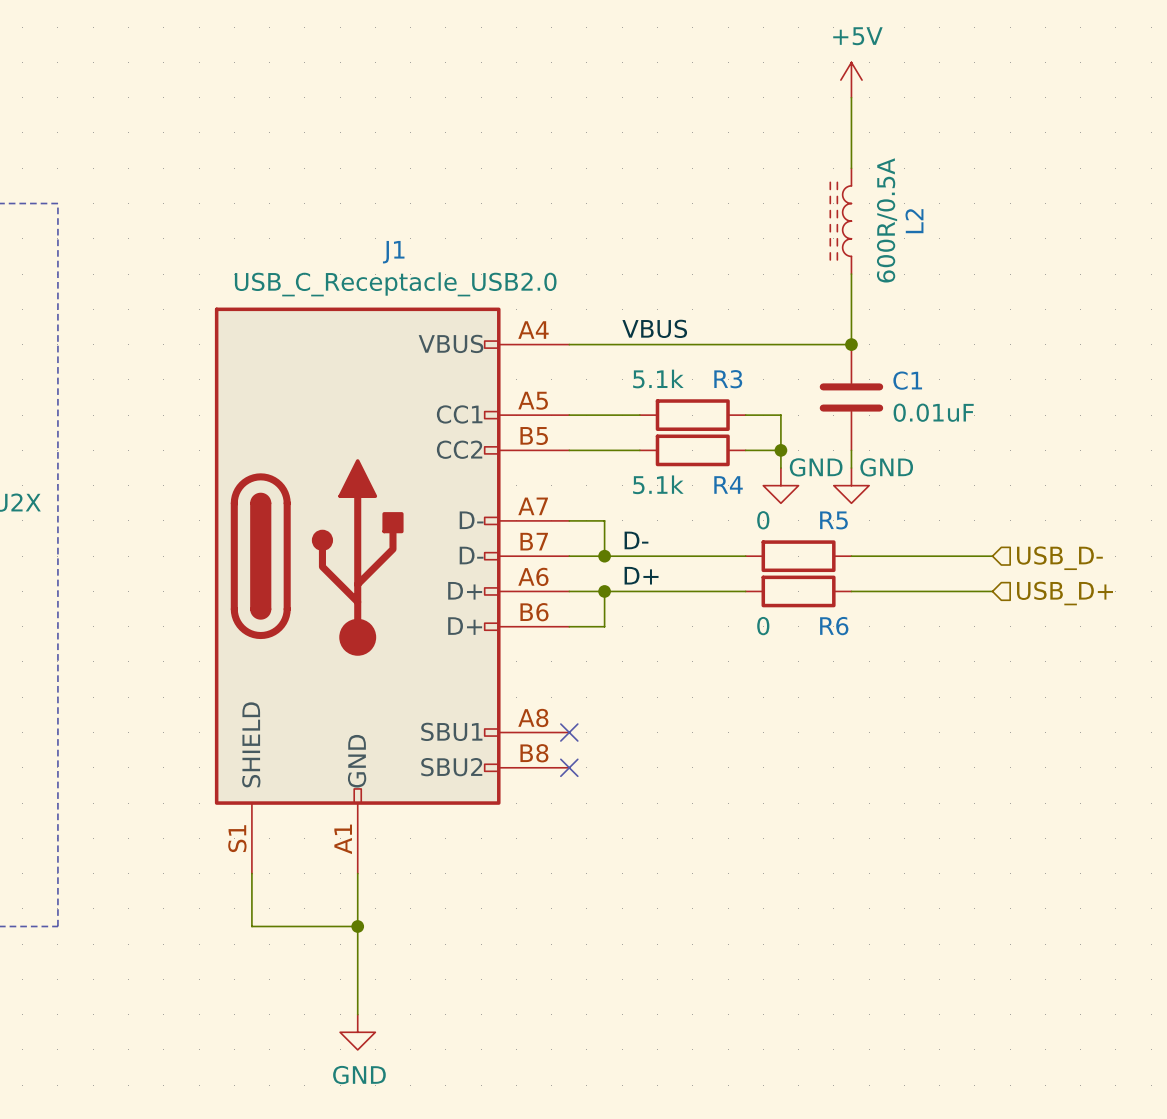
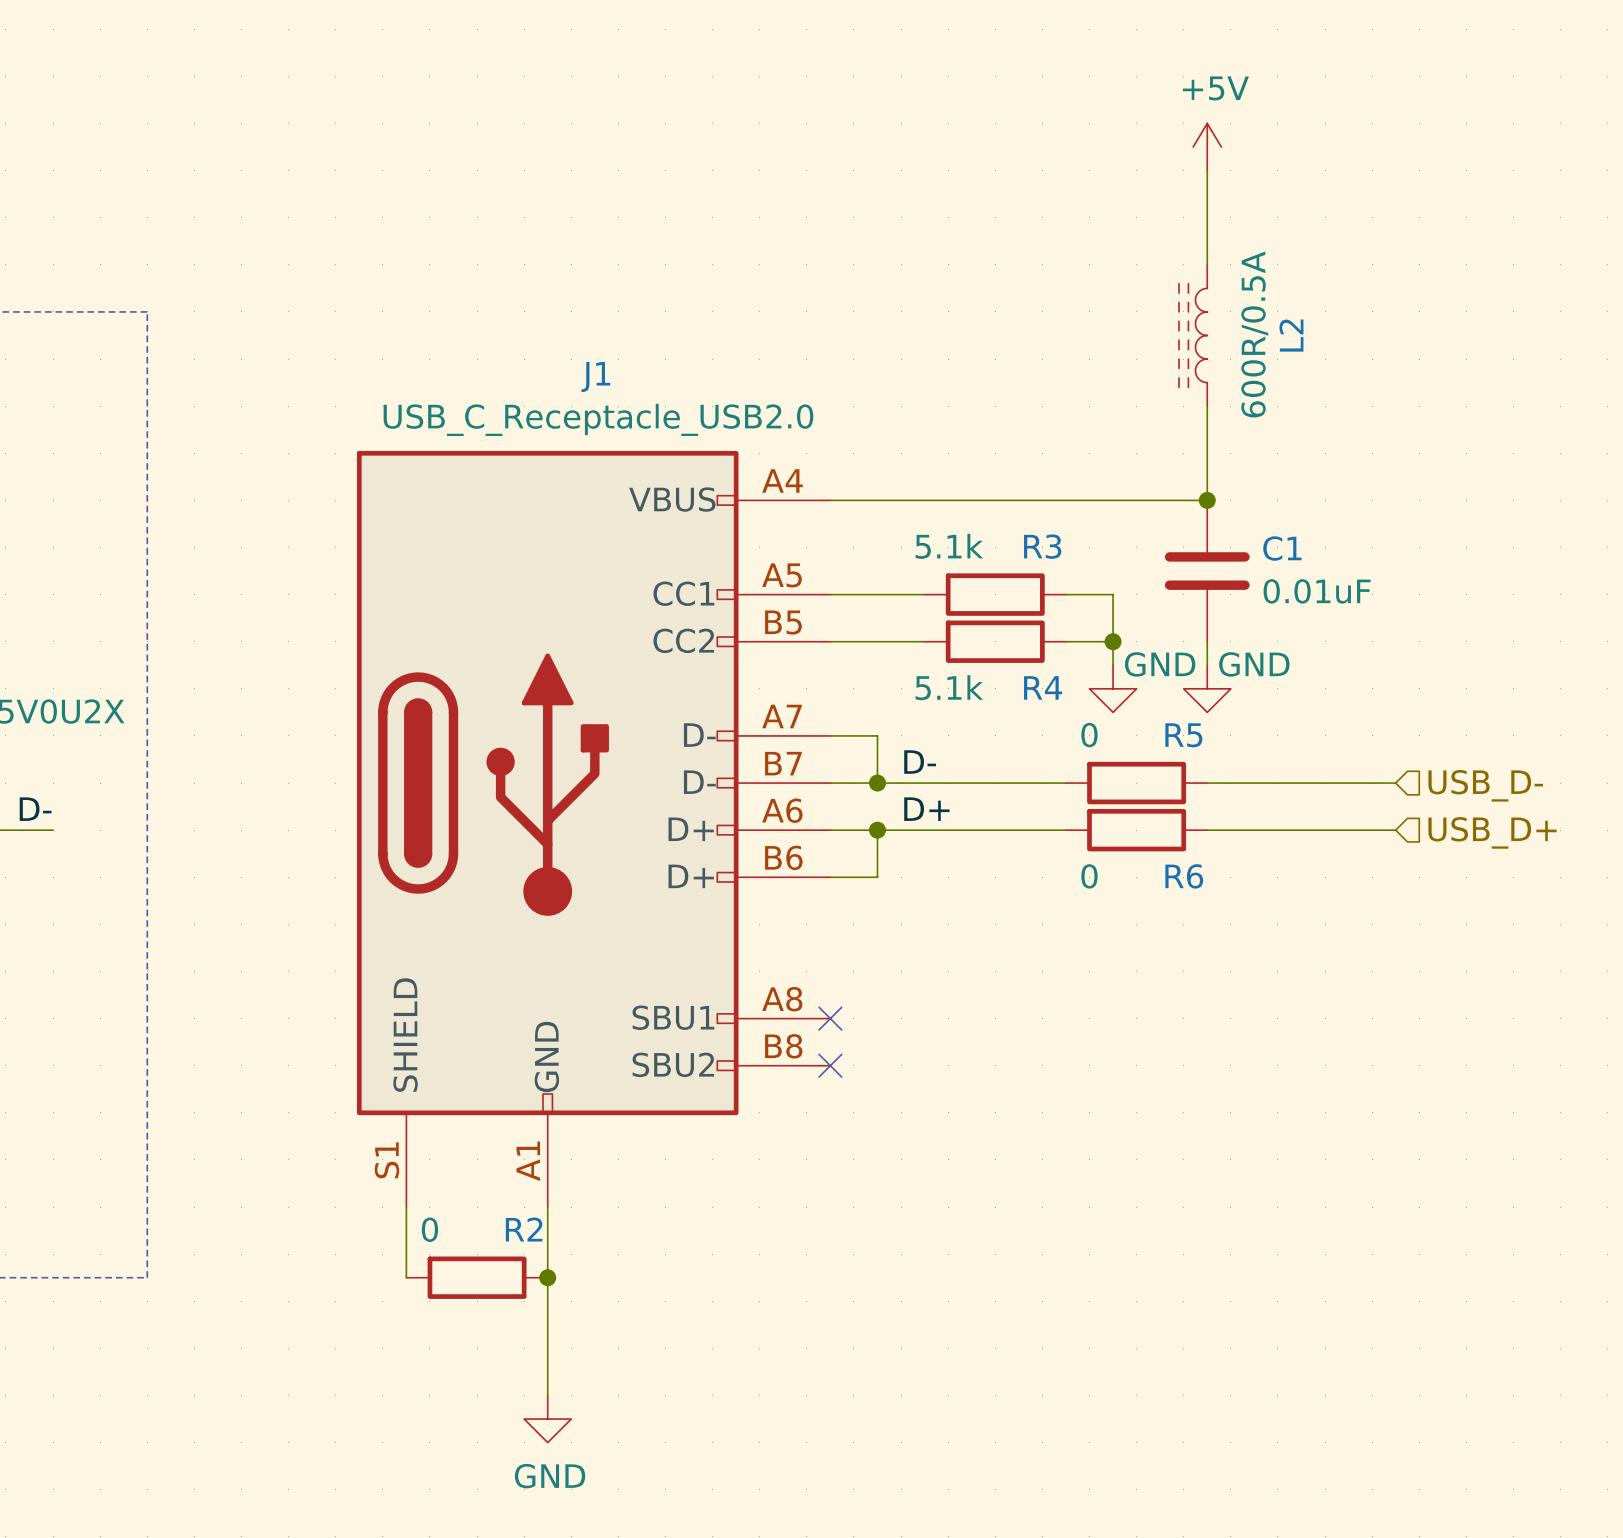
label: VBUS (654, 328) -> none
wire: (251, 926) (357, 926) -> none
R2: none -> 0 (477, 1277)

